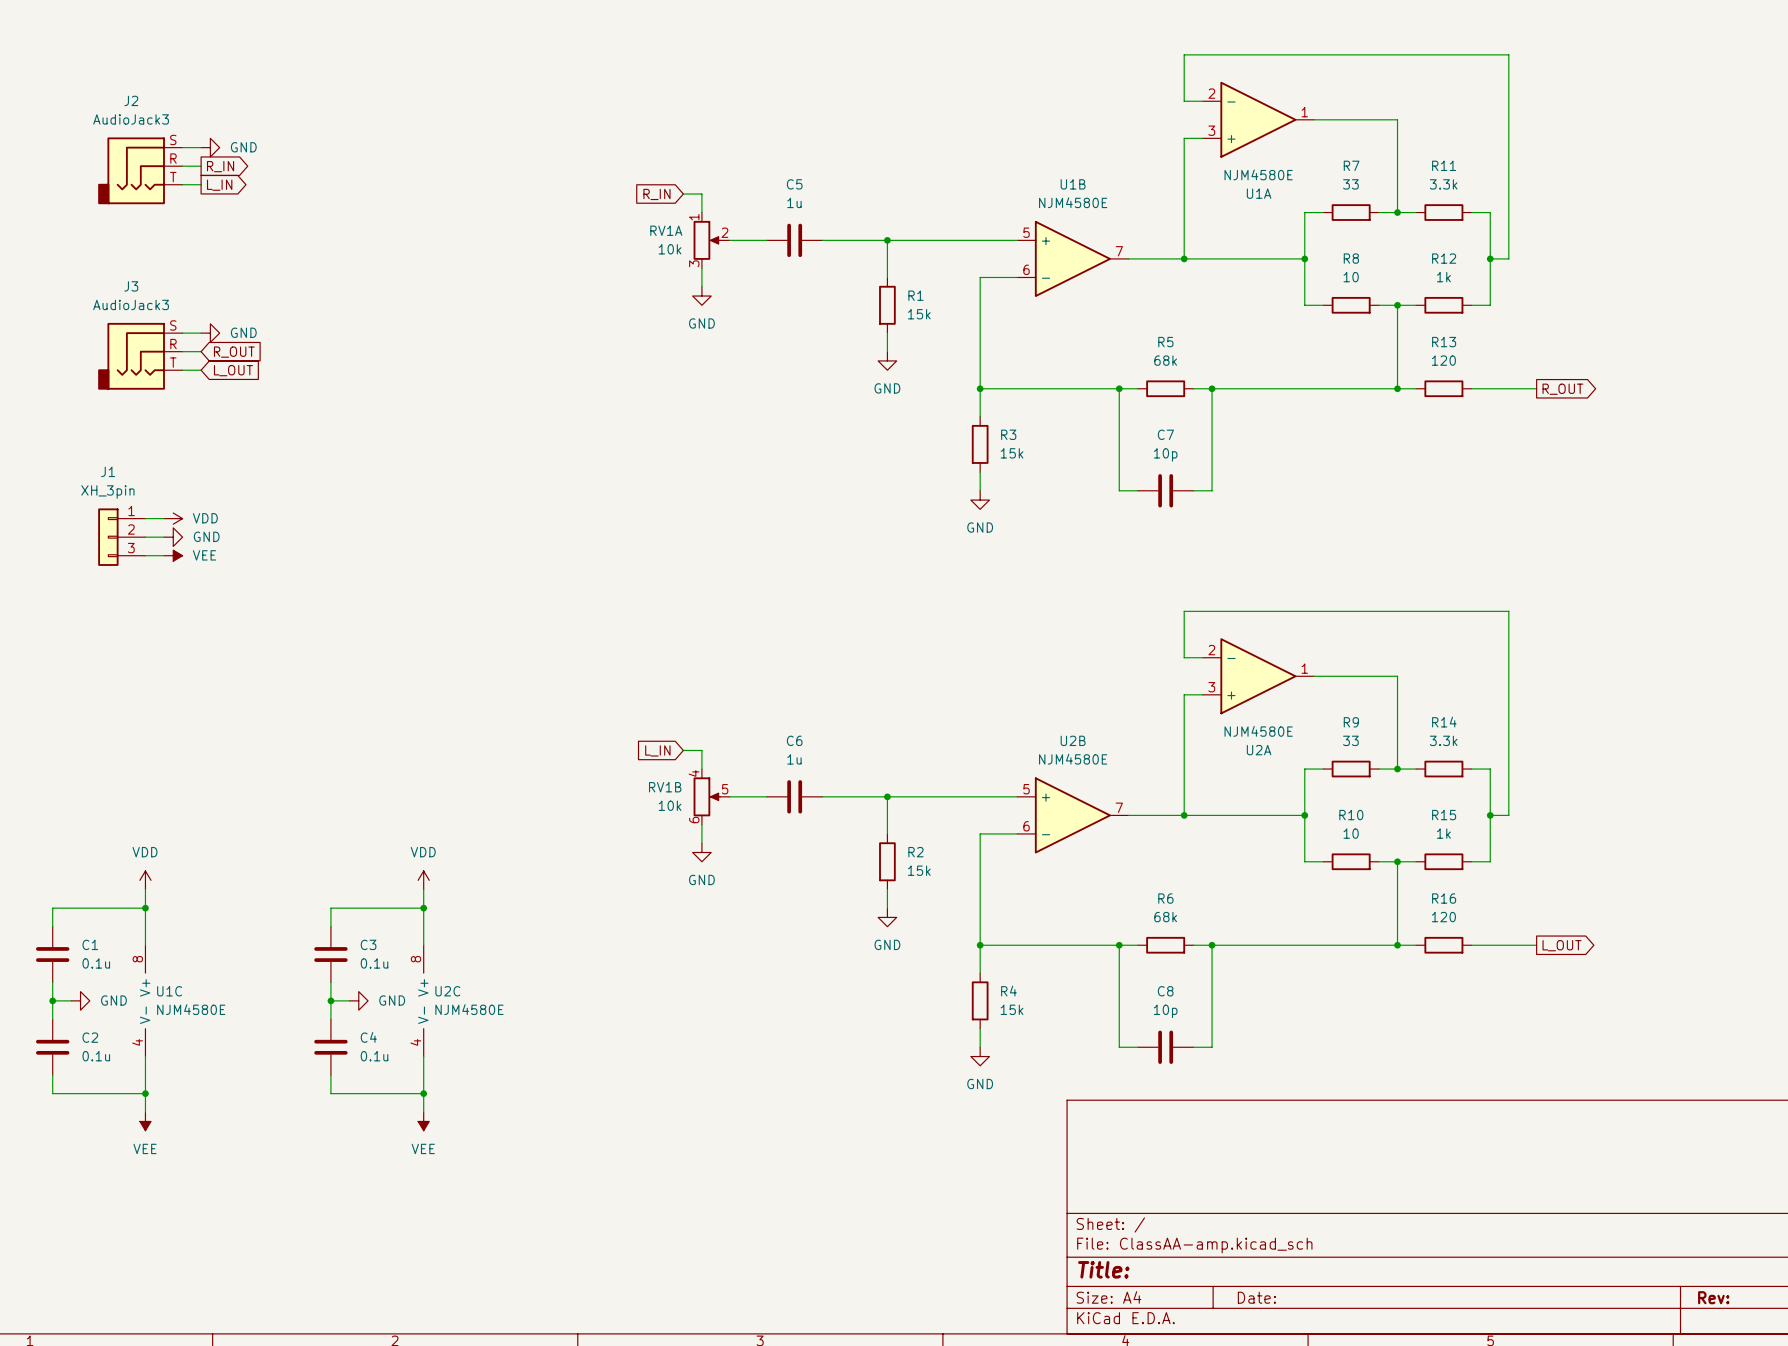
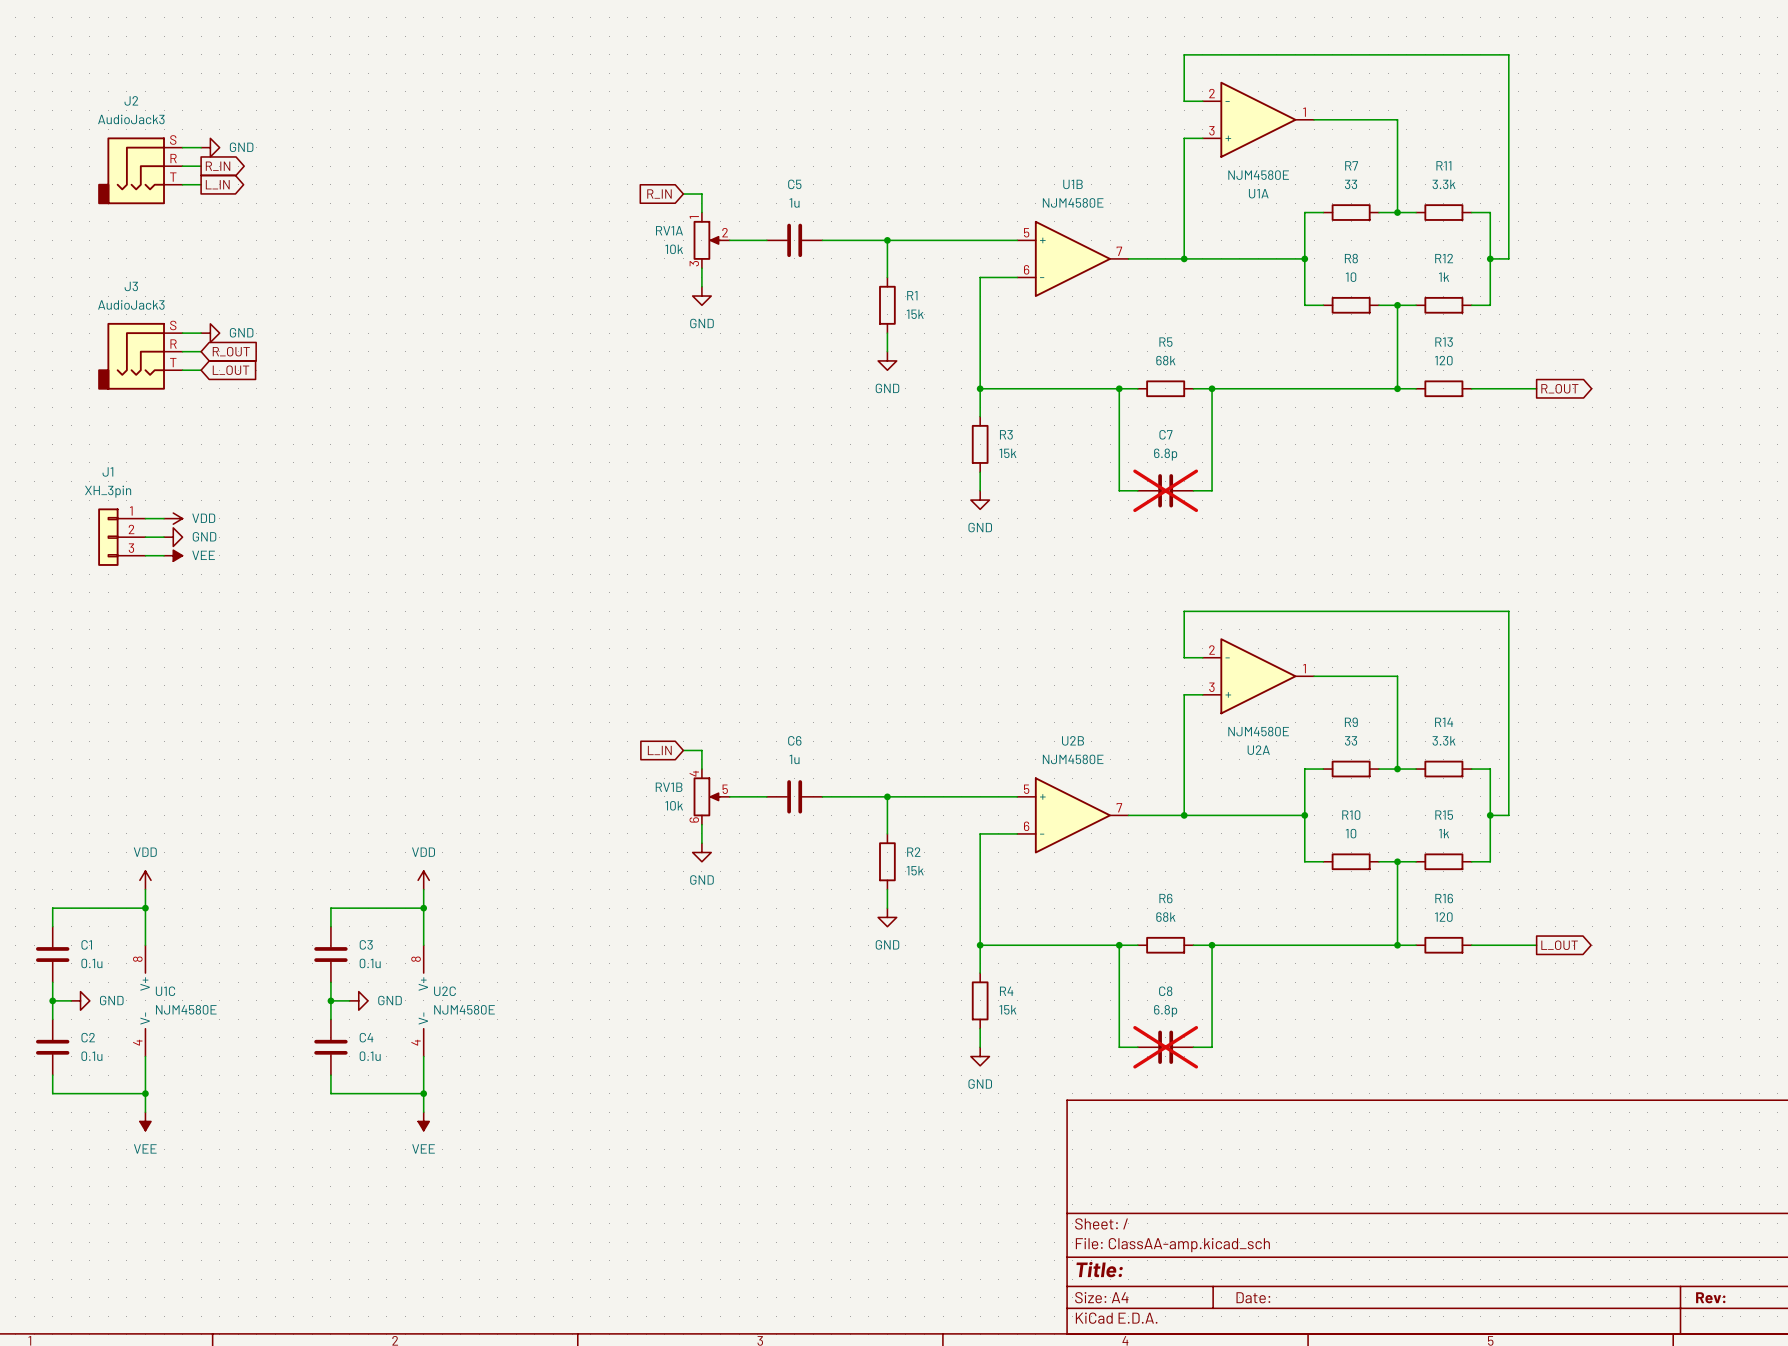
C7 value: 10p (1165, 454) -> 6.8p (1165, 454)
C7 do-not-place cross: none -> (1165, 490)
C8 value: 10p (1165, 1011) -> 6.8p (1165, 1011)
C8 do-not-place cross: none -> (1165, 1047)

